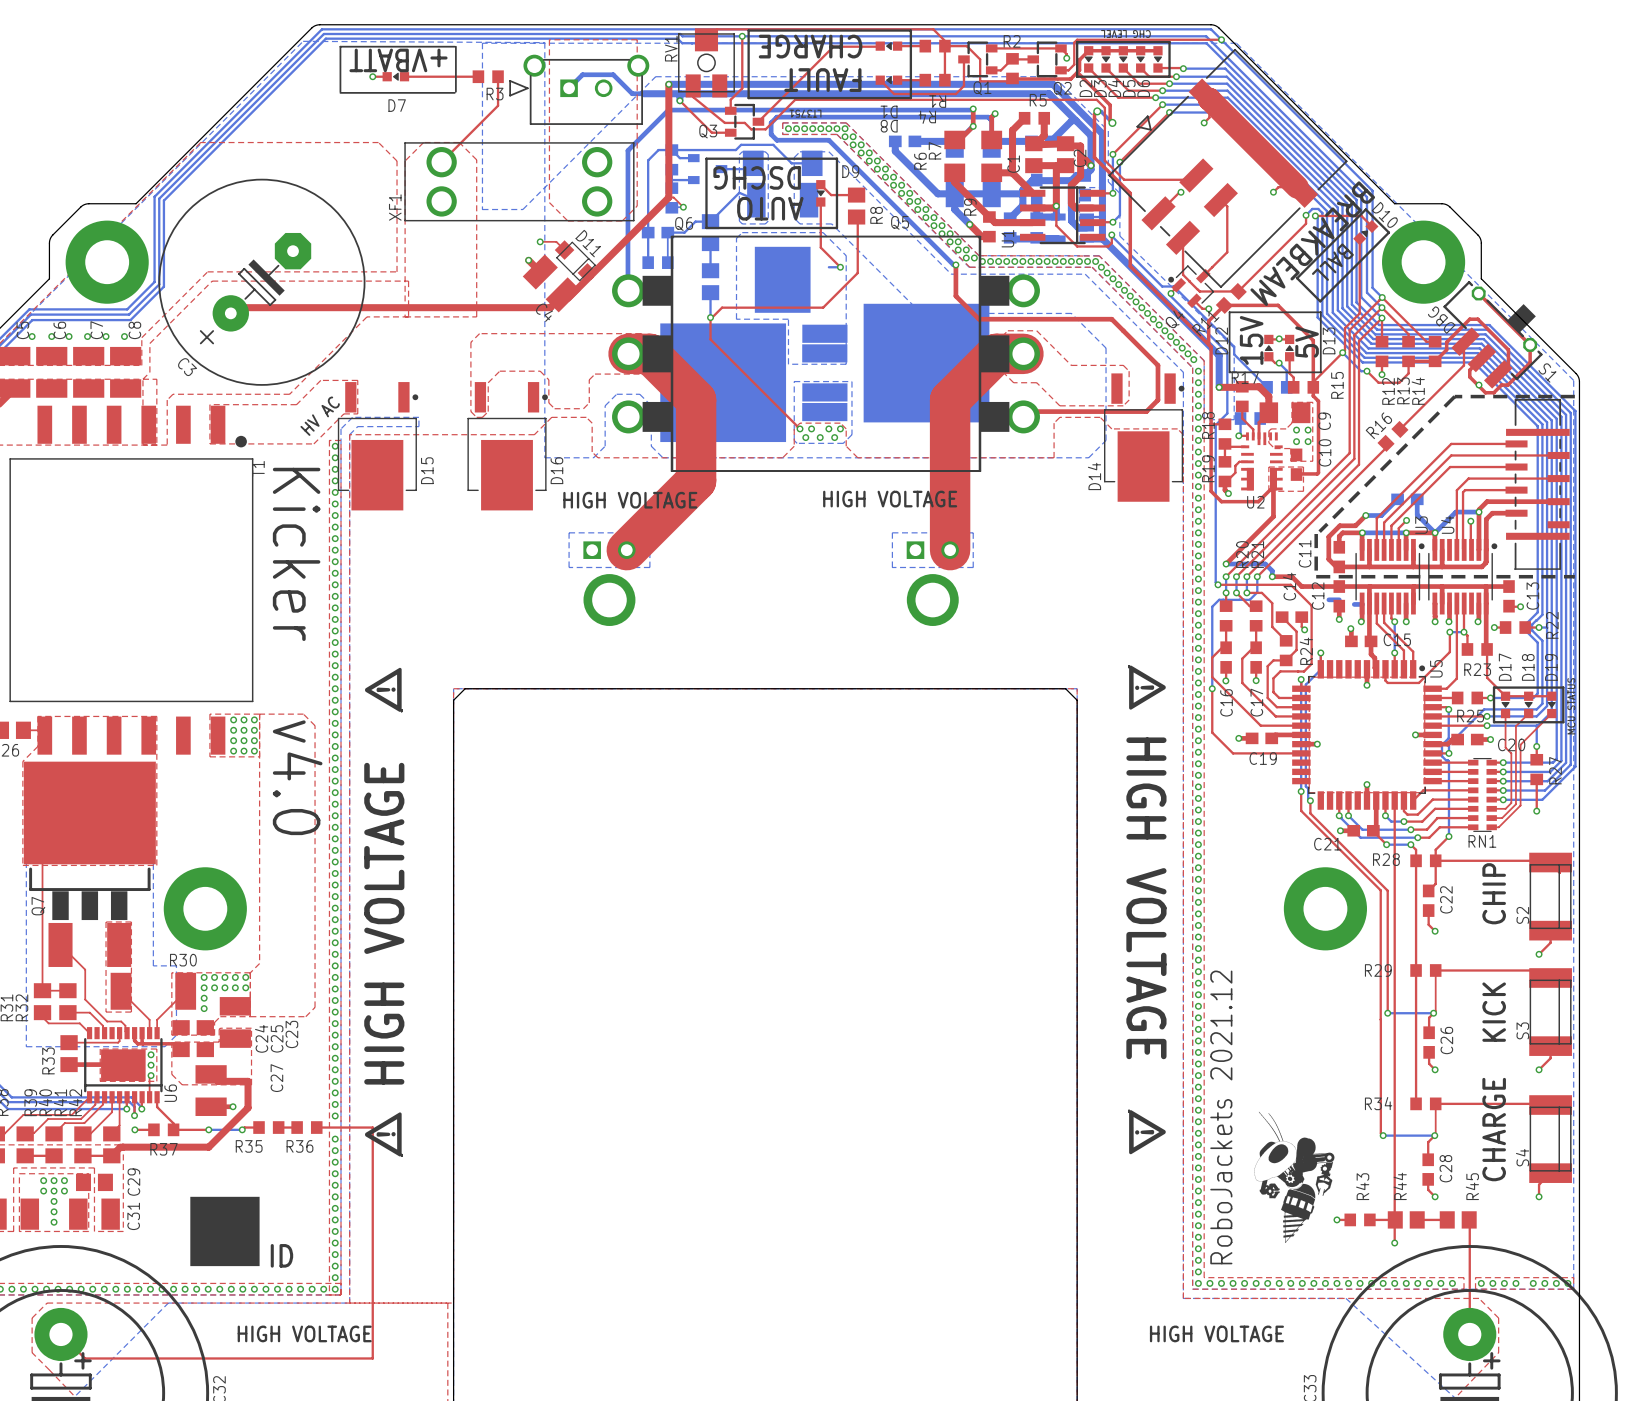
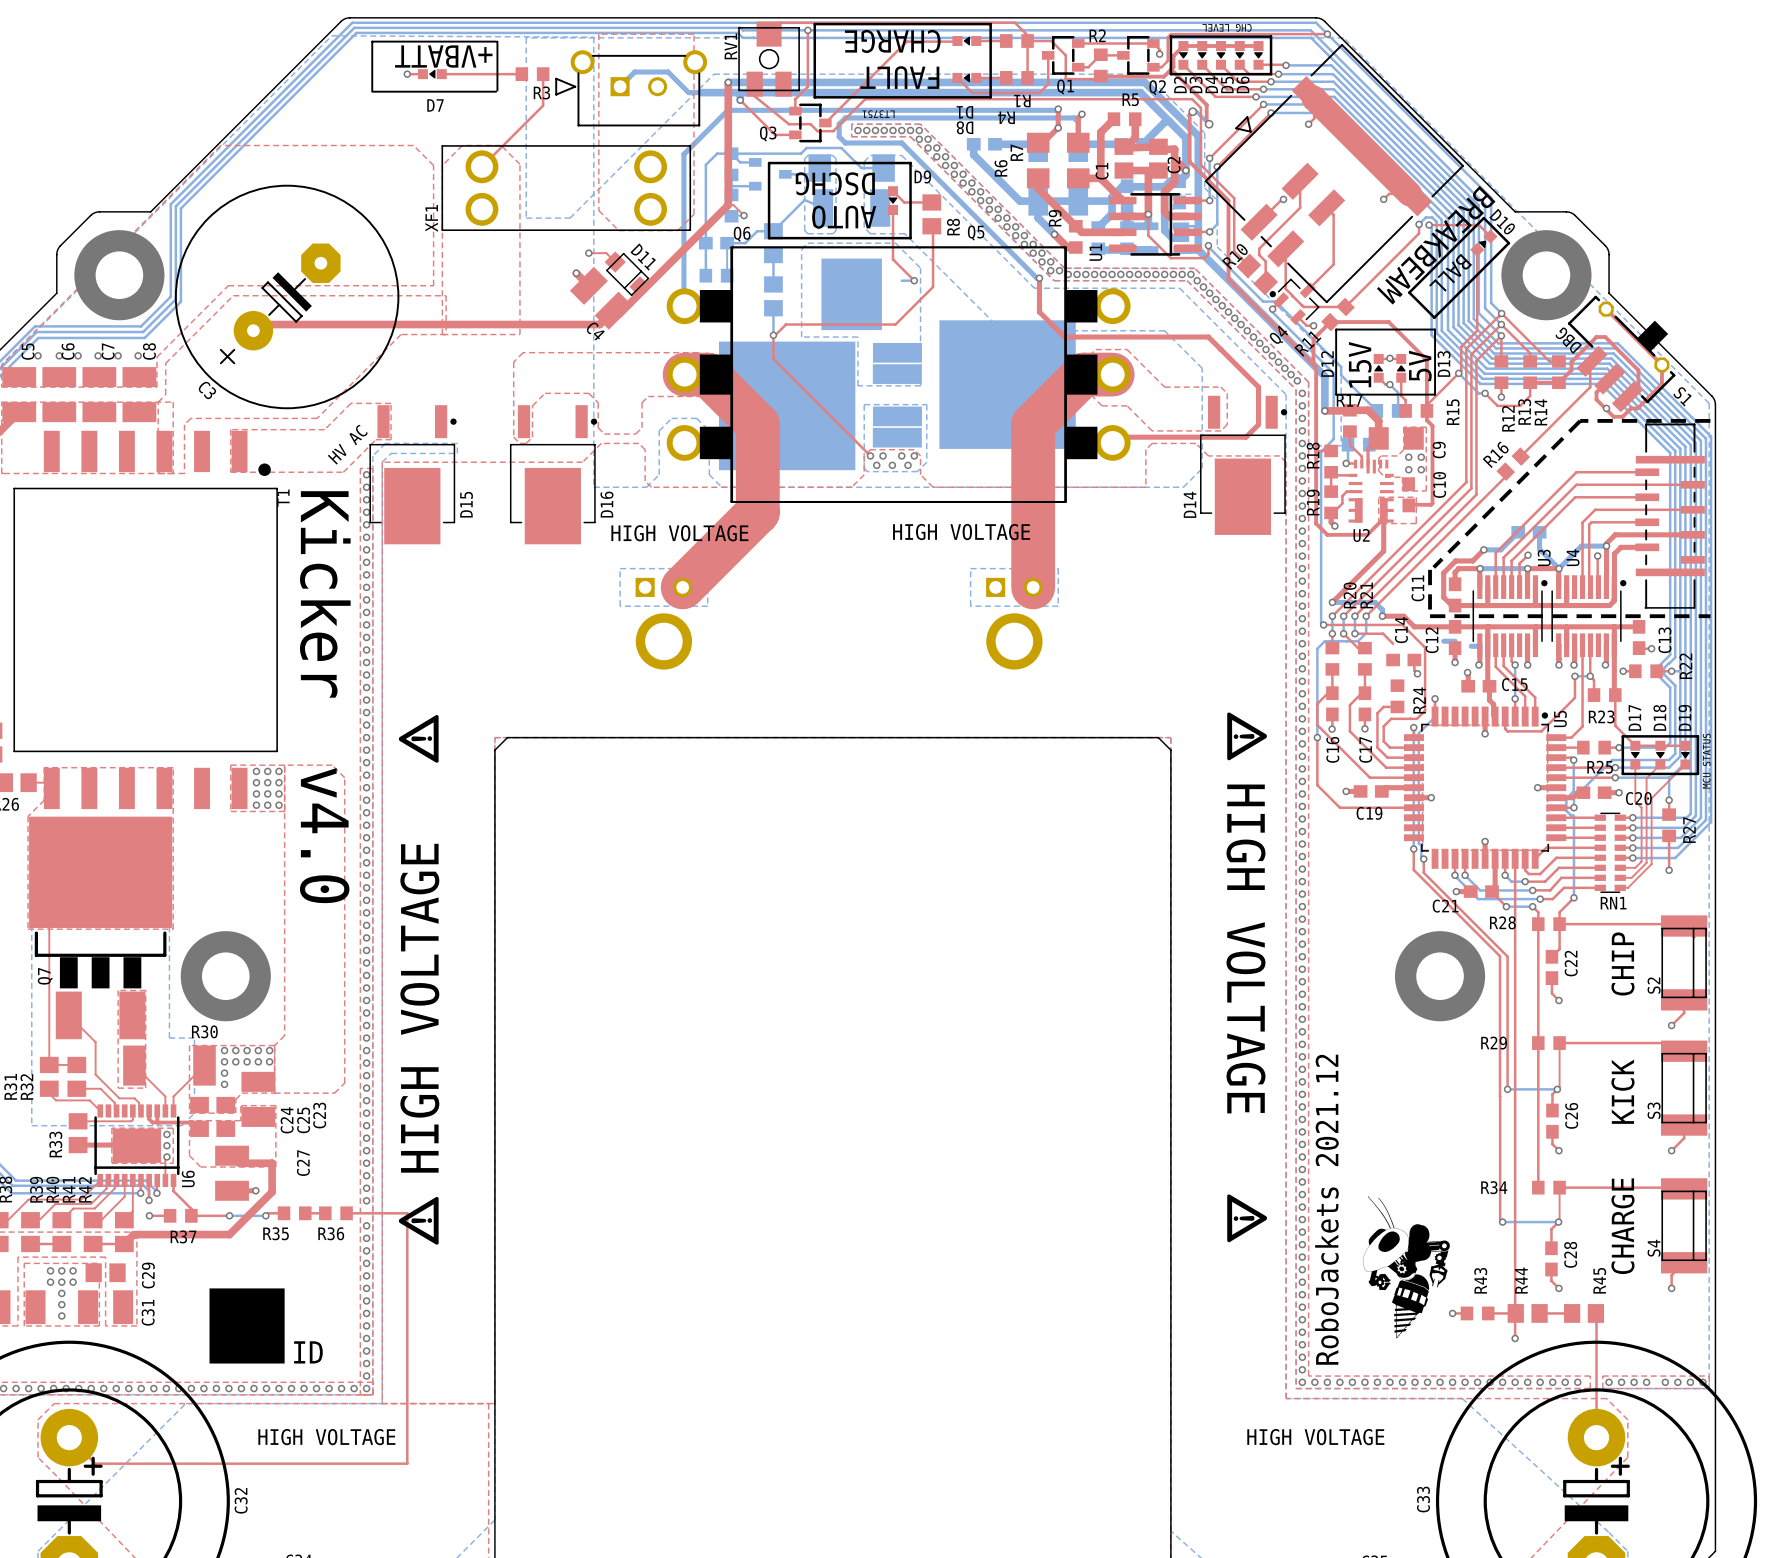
top track: (1196, 175) (1192, 179) (1124, 179) -> (1248, 266) (1234, 251) (1234, 198) (1221, 185)
top track: none -> (1300, 181) (1300, 207) (1259, 248) (1259, 254) (1265, 261) (1265, 282)
R10: none -> (1257, 274)
top track: (1261, 592) (1272, 603) (1272, 626) (1282, 636) -> (1371, 633) (1383, 633) (1393, 643)
top track: (1282, 617) (1296, 631) (1296, 650) (1286, 660) -> none

